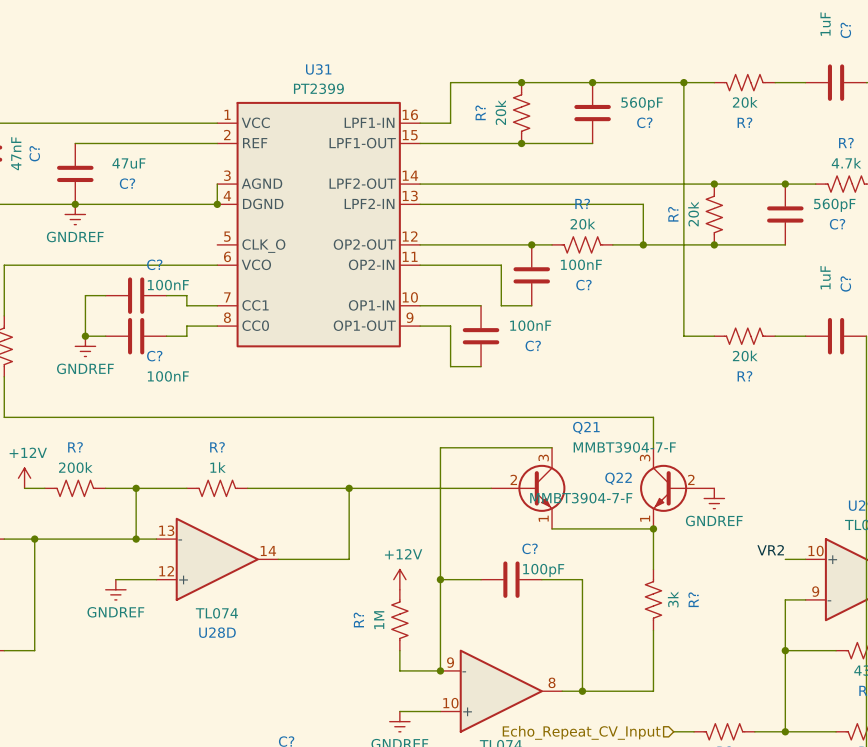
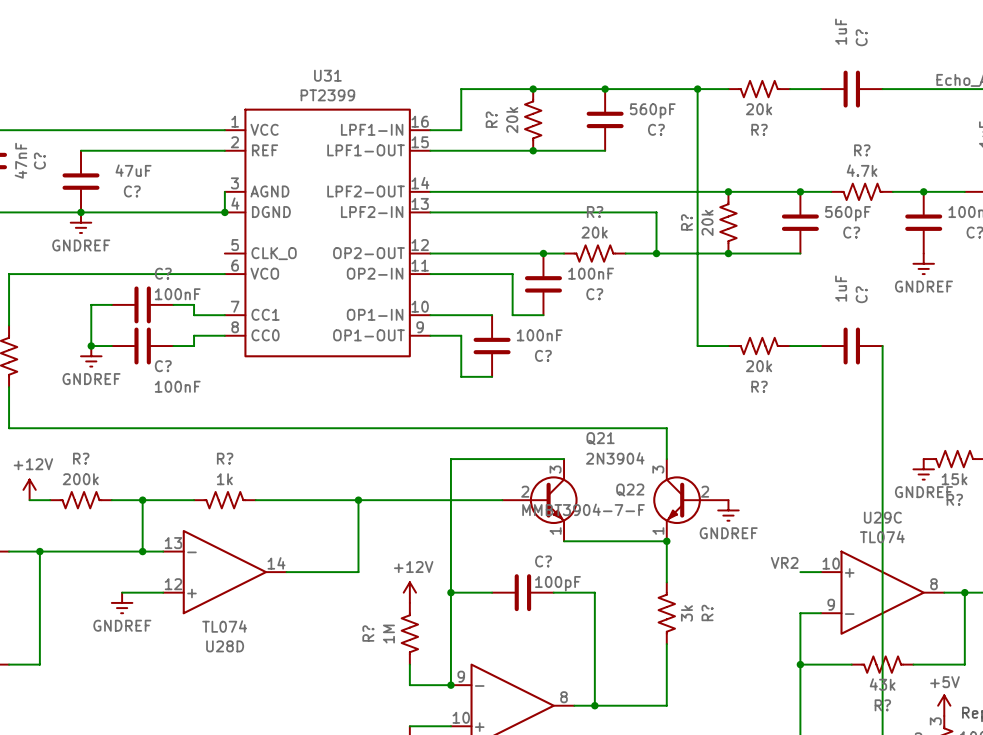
Q21 value: MMBT3904-7-F (624, 447) -> 2N3904 (615, 458)

